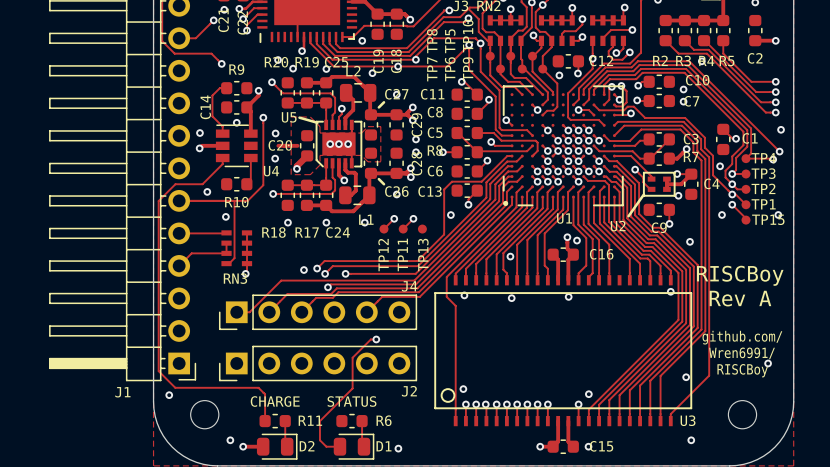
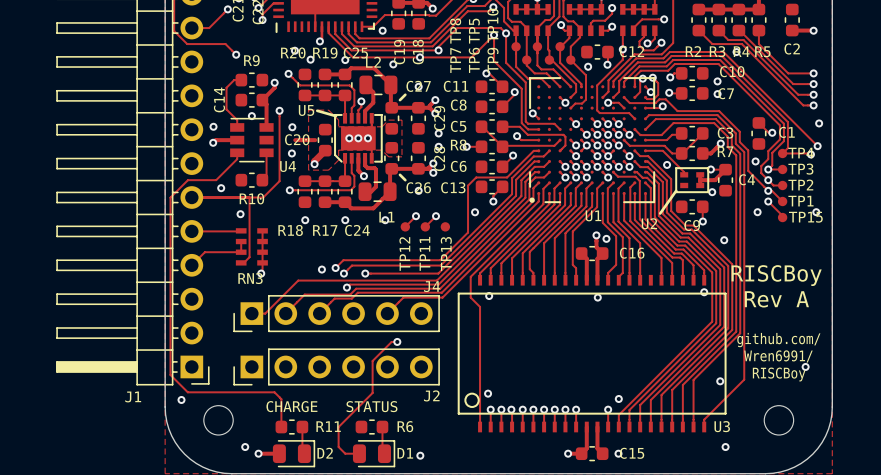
track: (635, 169) (643, 177) (643, 182) (651, 189) -> none
via: (510, 256) -> none
via: (511, 298) -> none

